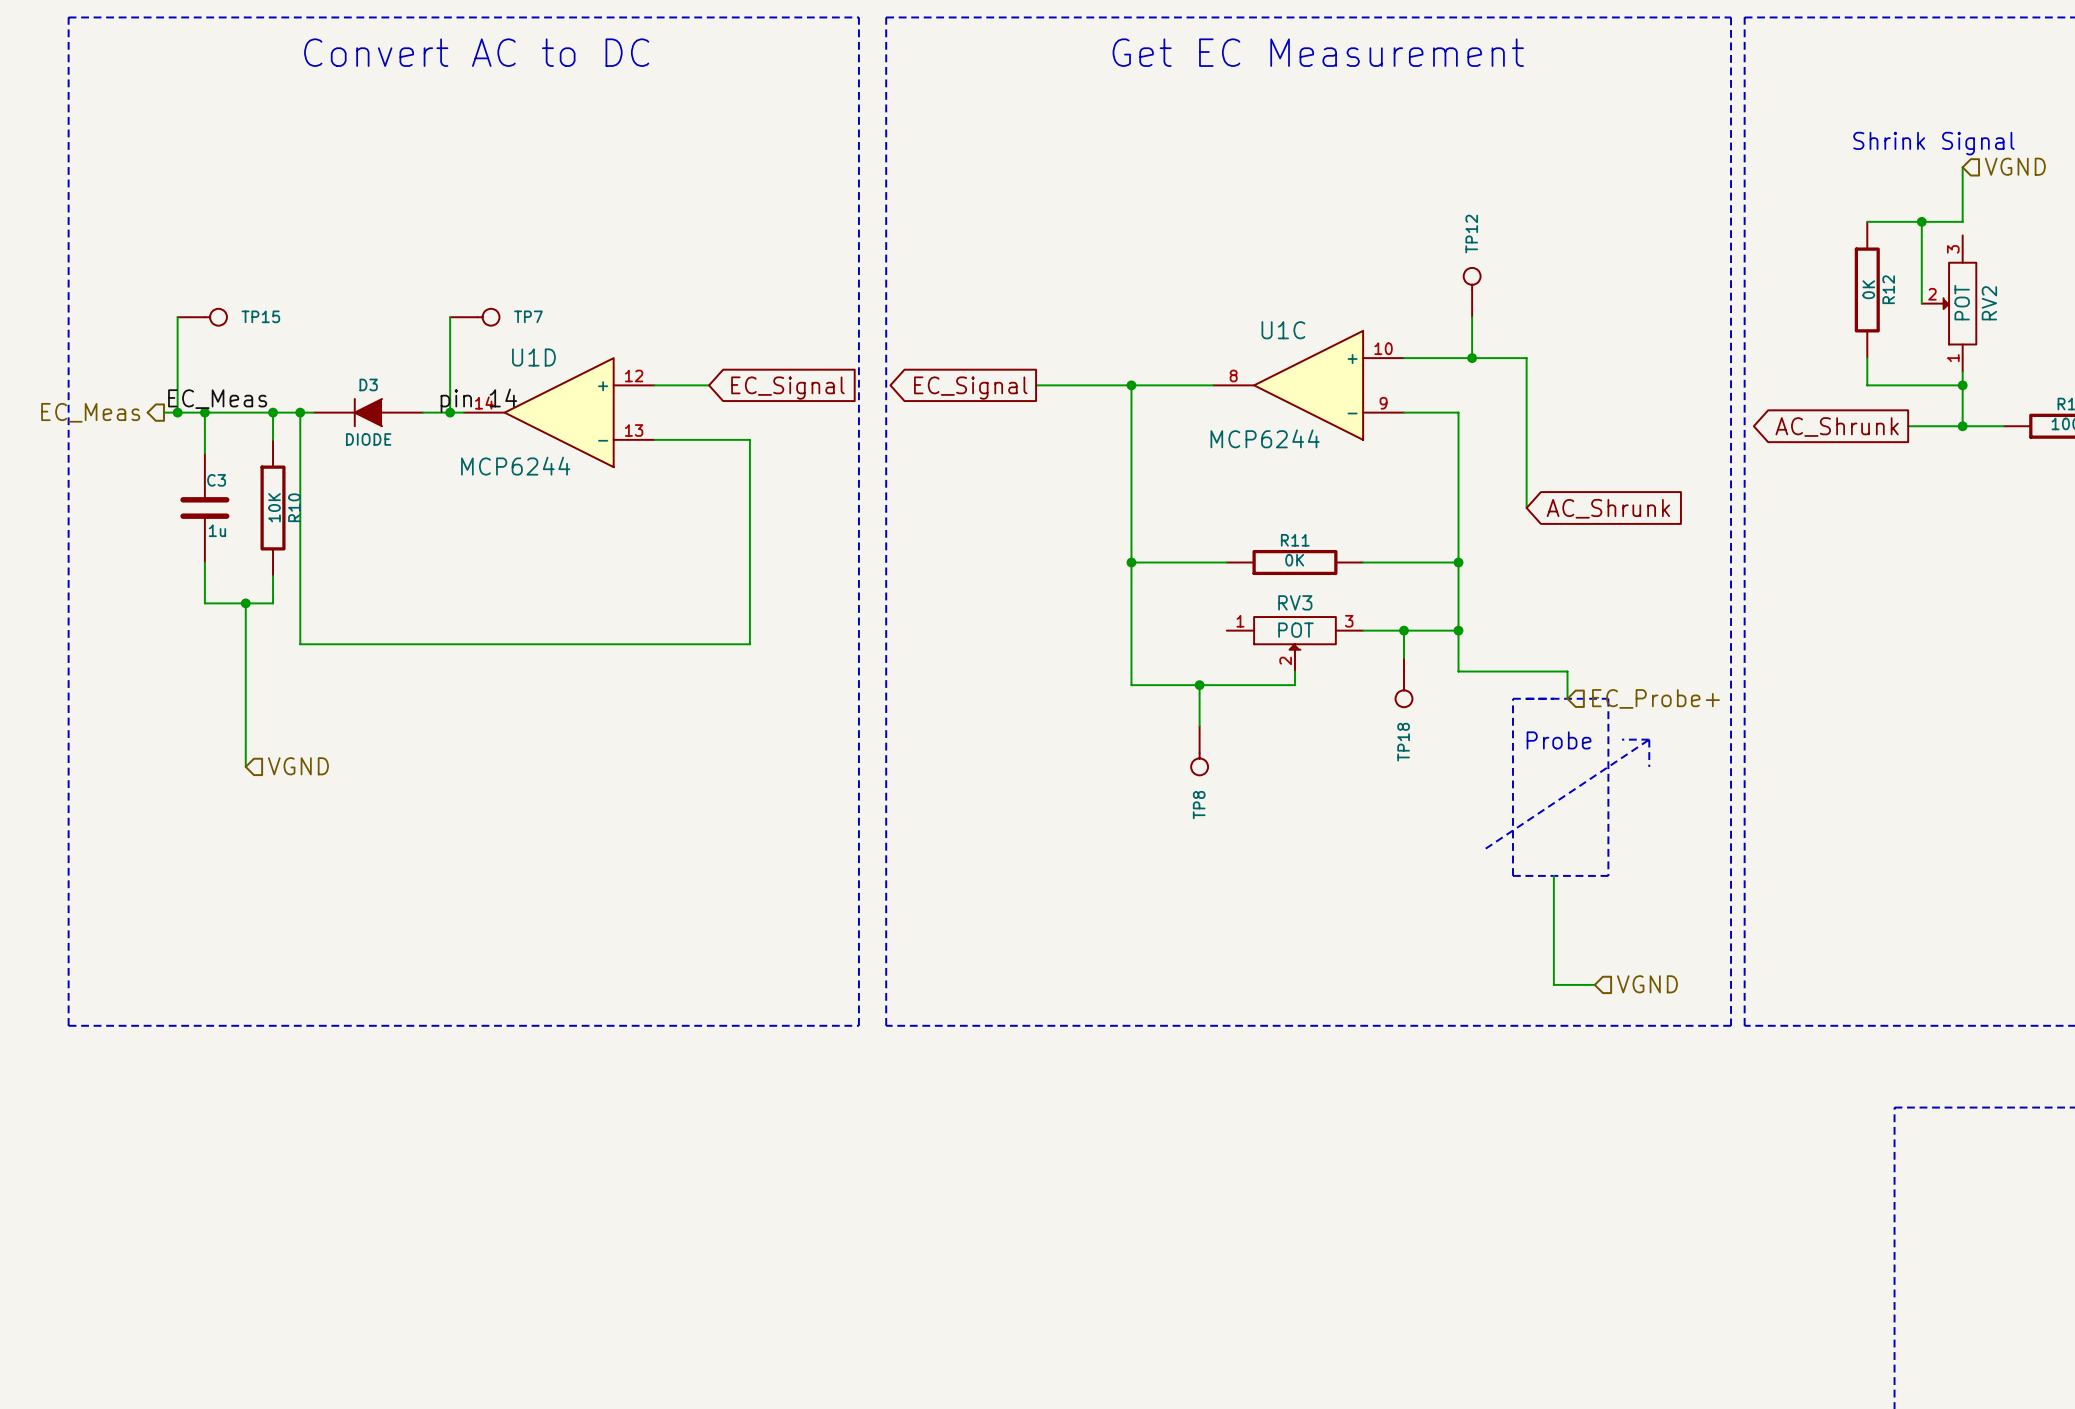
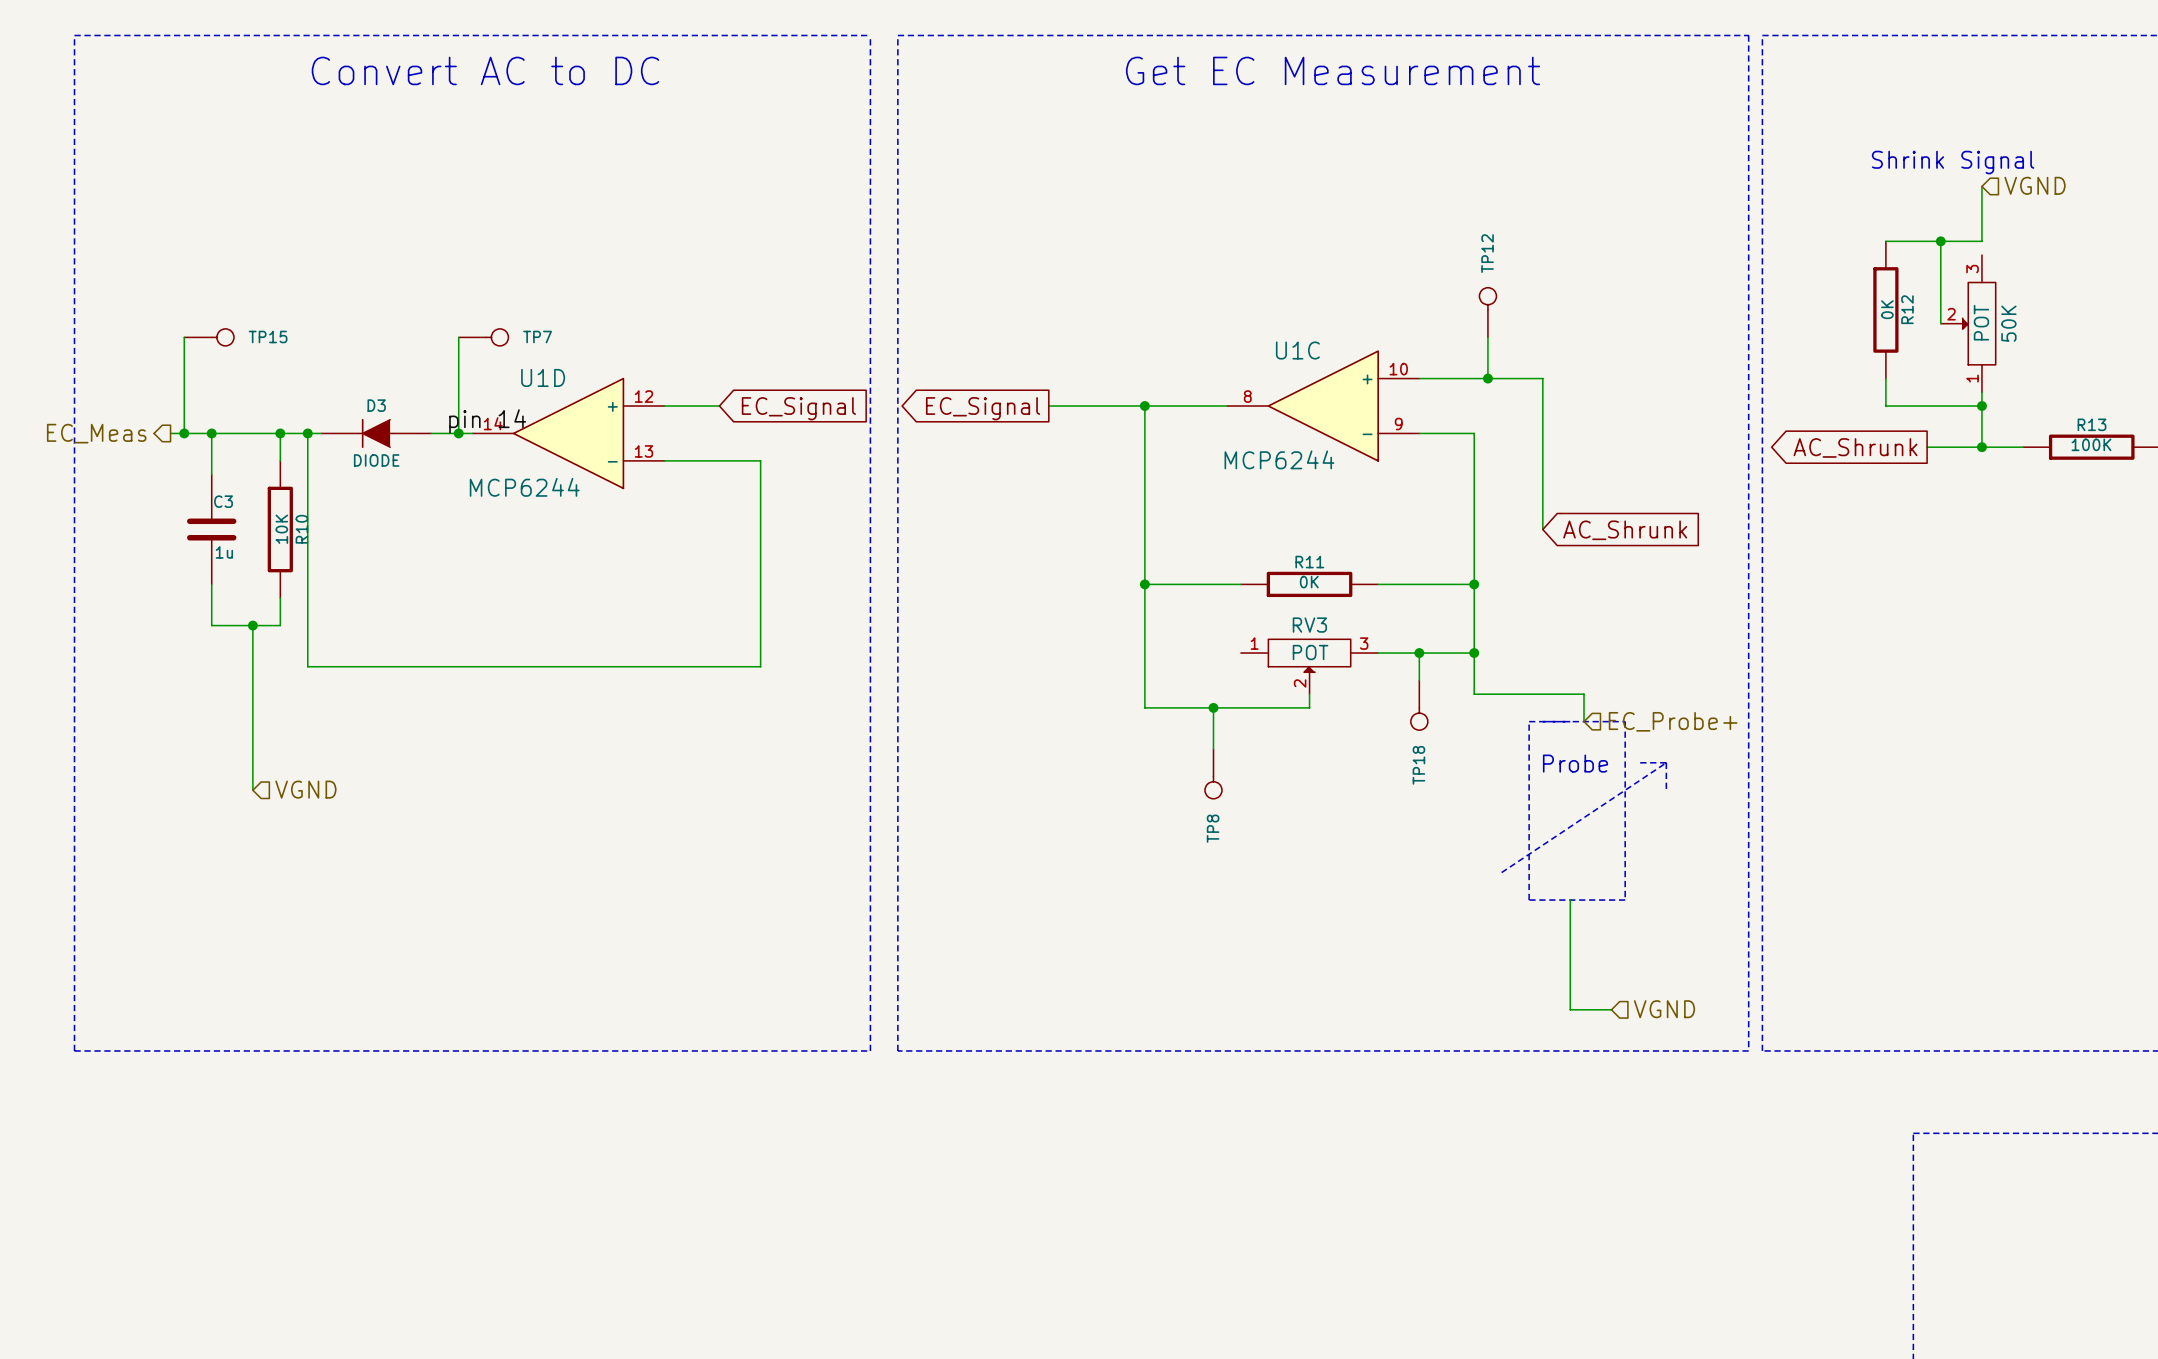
RV2 name: RV2 (1989, 303) -> 50K (2008, 323)
label: EC_Meas (217, 399) -> none

